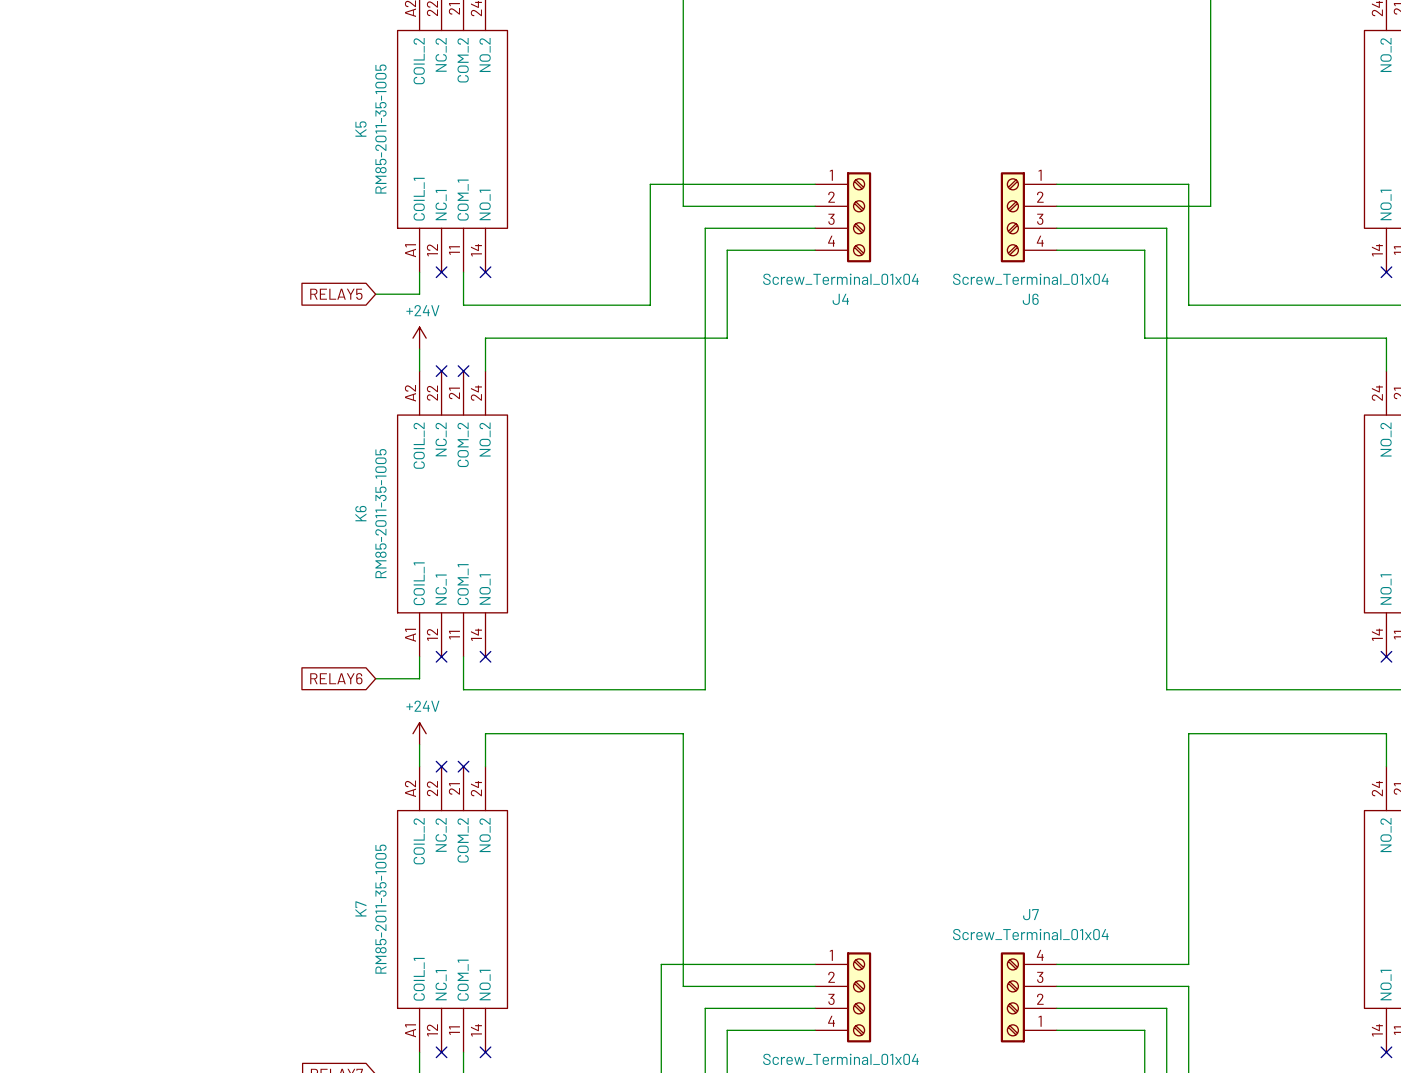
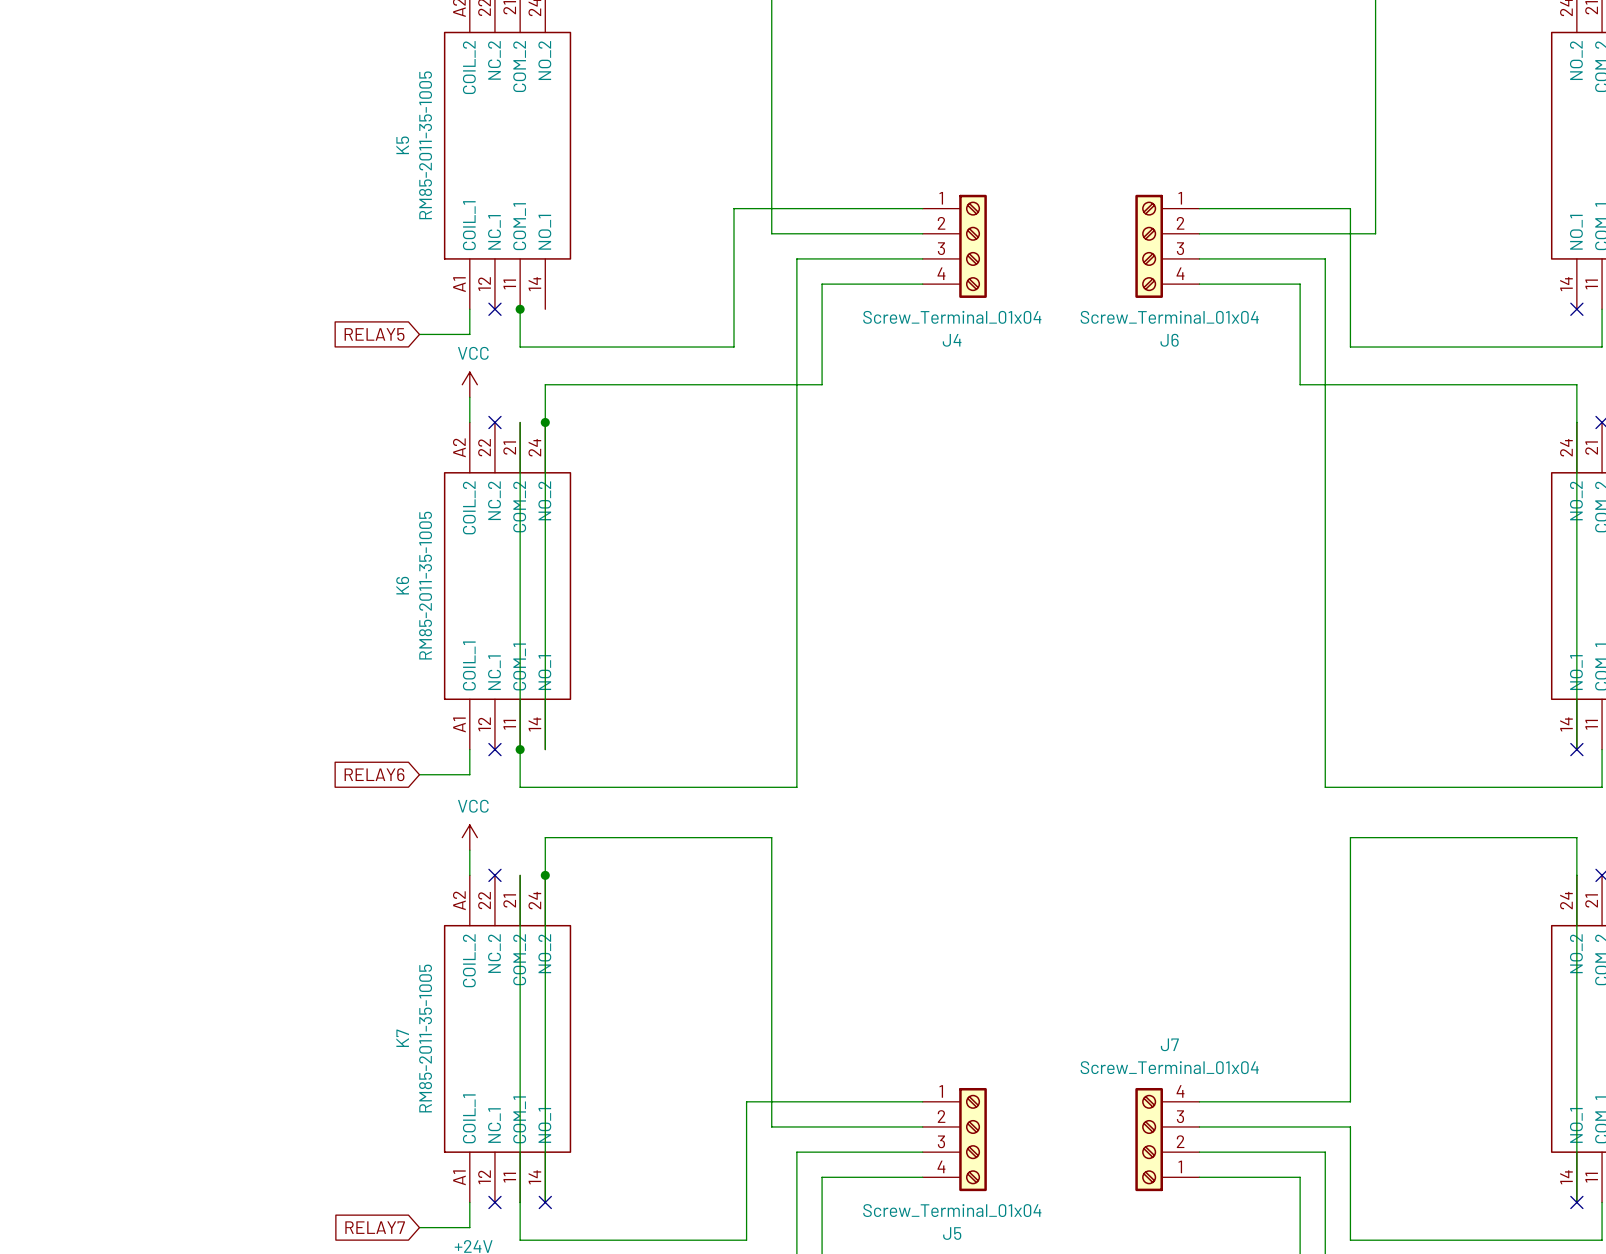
junction: none -> (520, 309)
no-connect mark: (485, 272) -> none
power symbol: +24V (419, 338) -> VCC (469, 384)
wire: none -> (520, 422) (520, 749)
no-connect mark: (463, 371) -> none
wire: none -> (545, 422) (545, 749)
junction: none -> (545, 422)
wire: none -> (1576, 422) (1576, 749)
junction: none -> (520, 749)
no-connect mark: (485, 656) -> none
power symbol: +24V (419, 733) -> VCC (469, 837)
wire: none -> (520, 875) (520, 1202)
no-connect mark: (463, 766) -> none
wire: none -> (545, 875) (545, 1202)
junction: none -> (545, 875)
wire: none -> (1576, 875) (1576, 1202)

